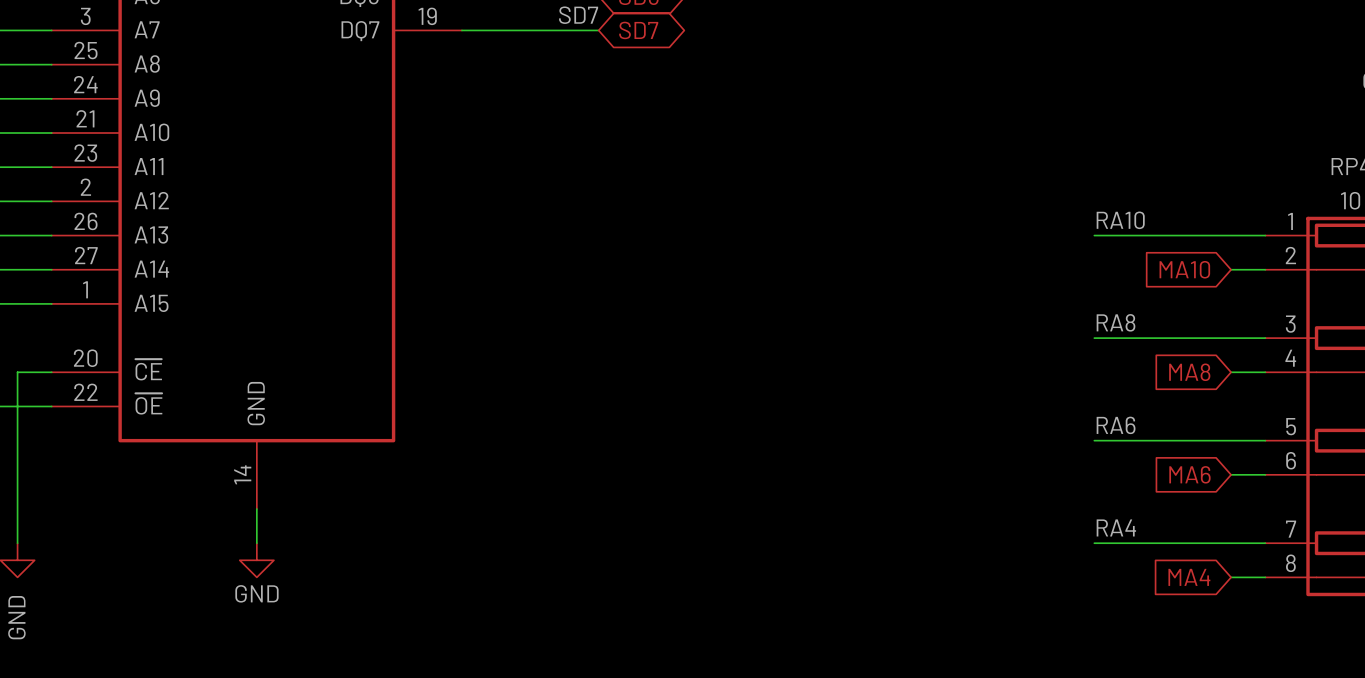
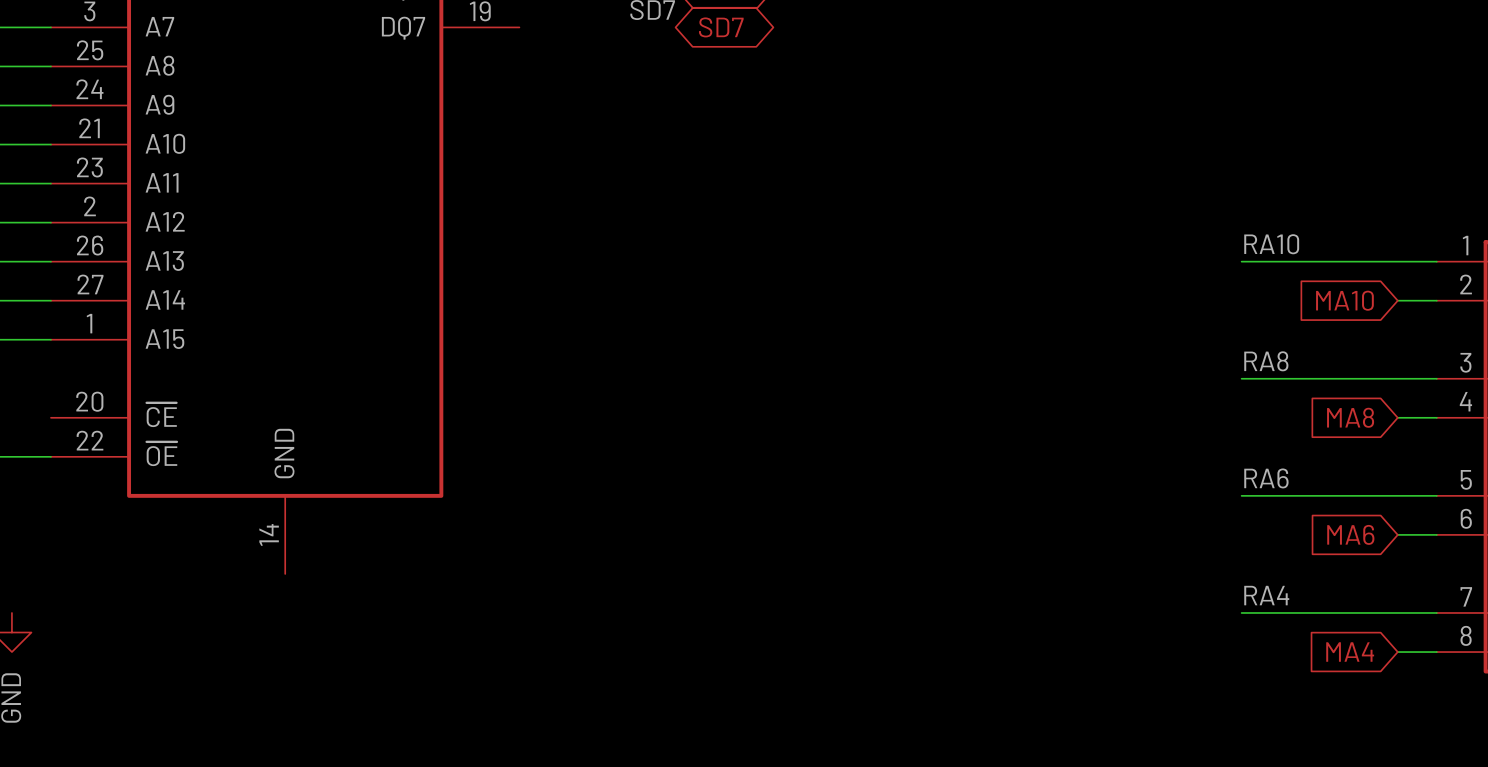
wire: (461, 30) (598, 30) -> none
wire: (51, 372) (17, 372) (17, 543) -> none
wire: (256, 509) (256, 543) -> none
power symbol: GND (256, 560) -> none

